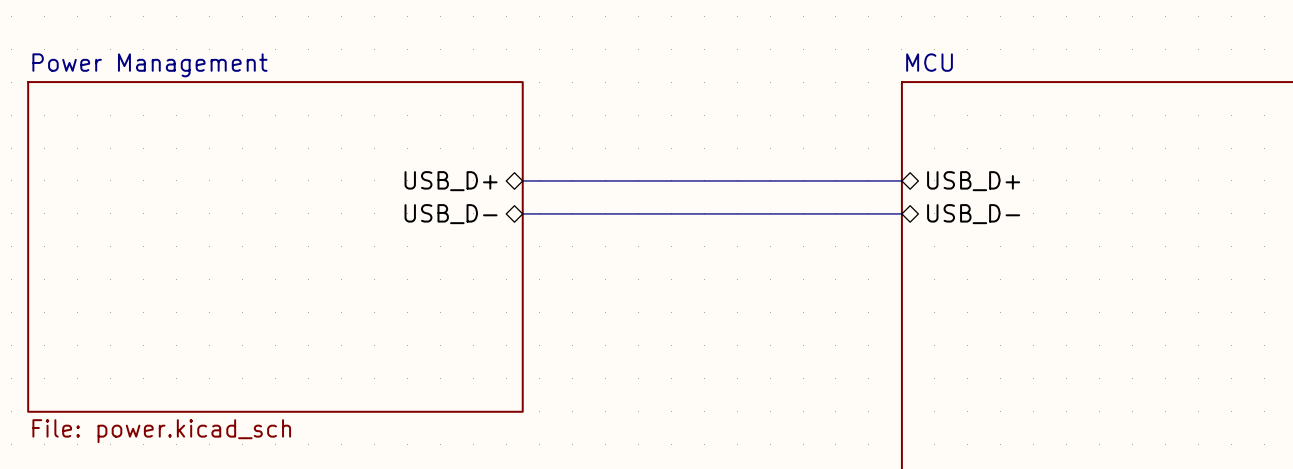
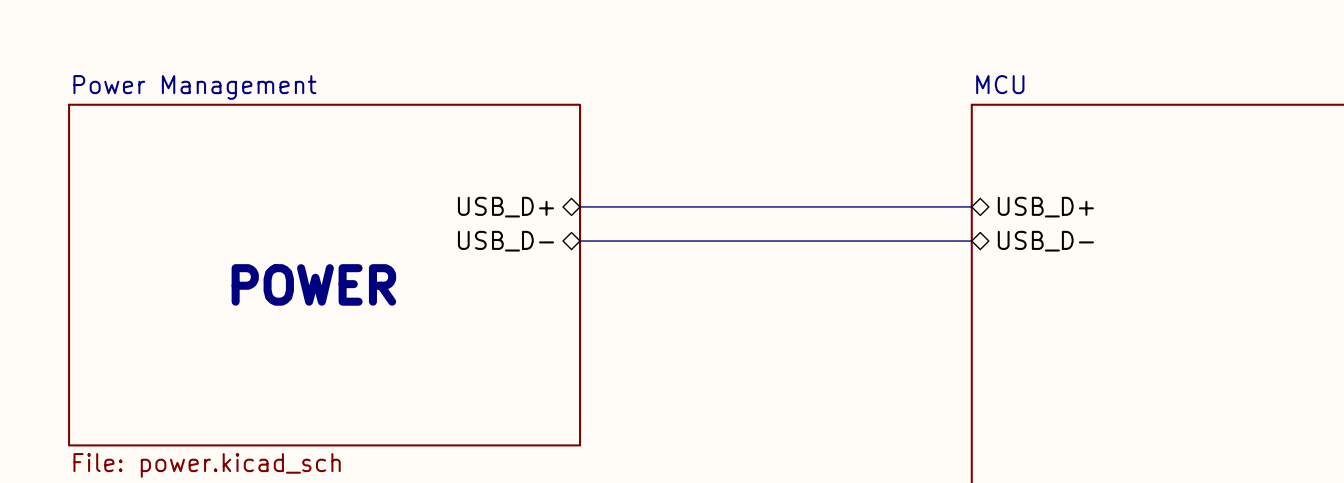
text: none -> POWER (313, 284)

